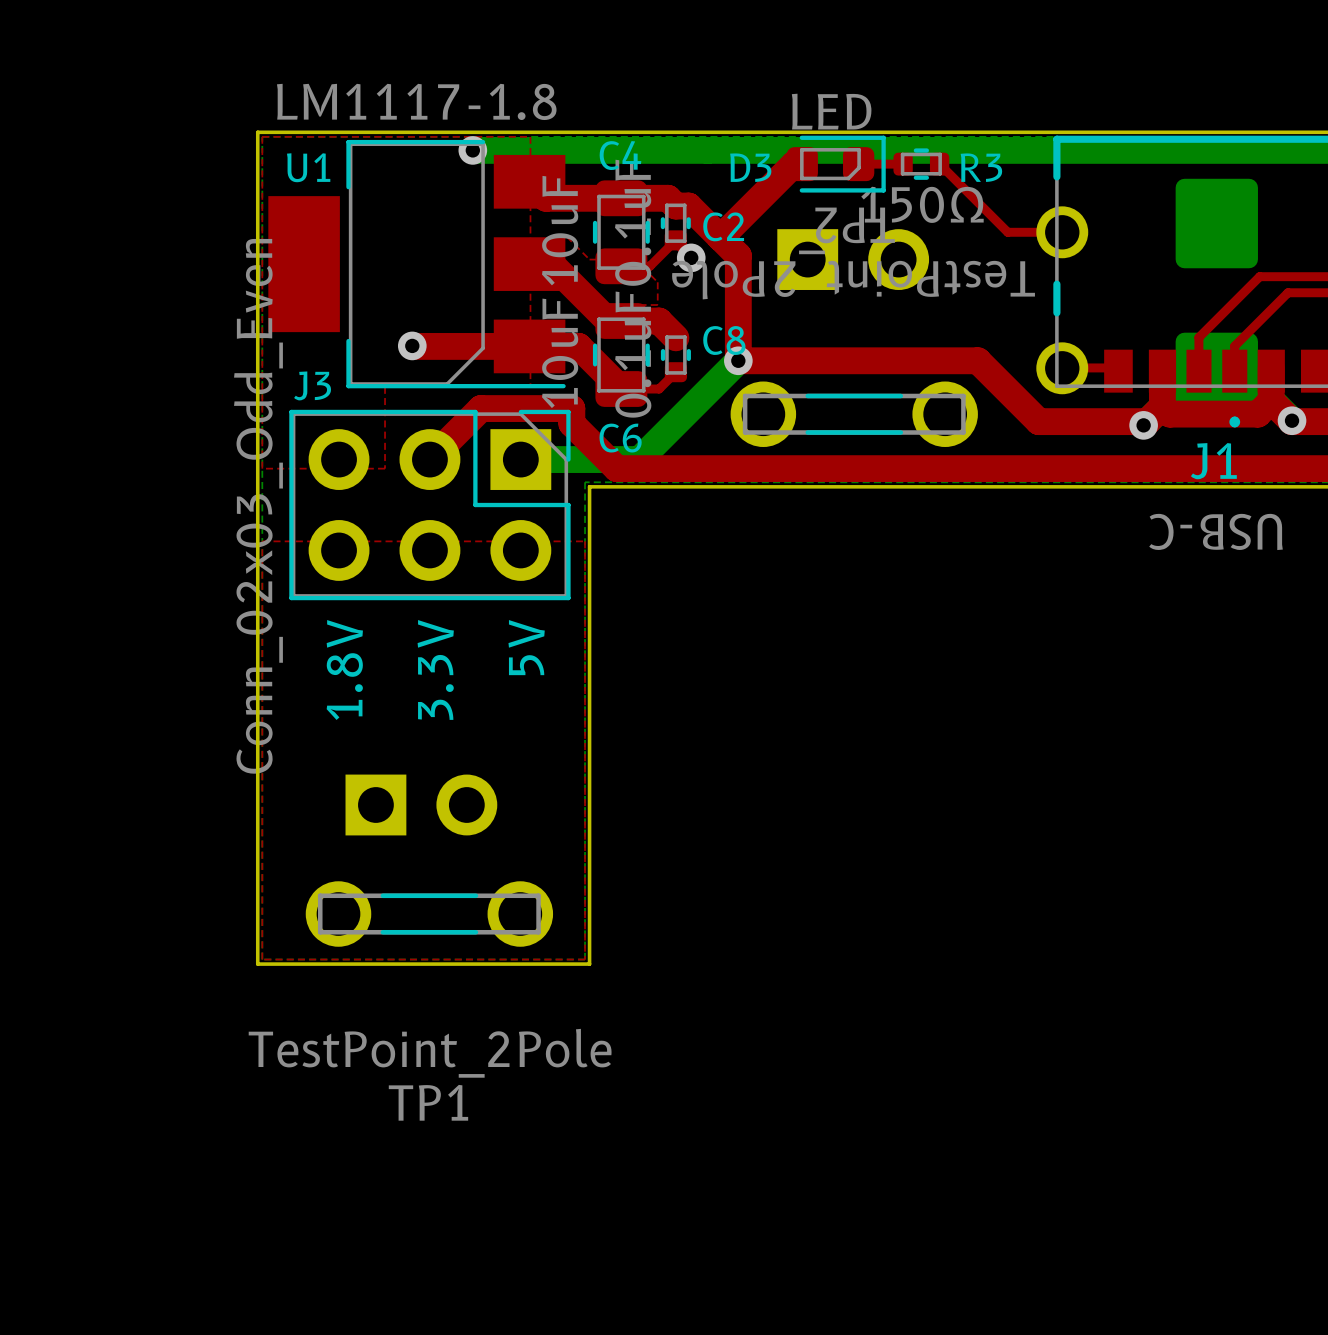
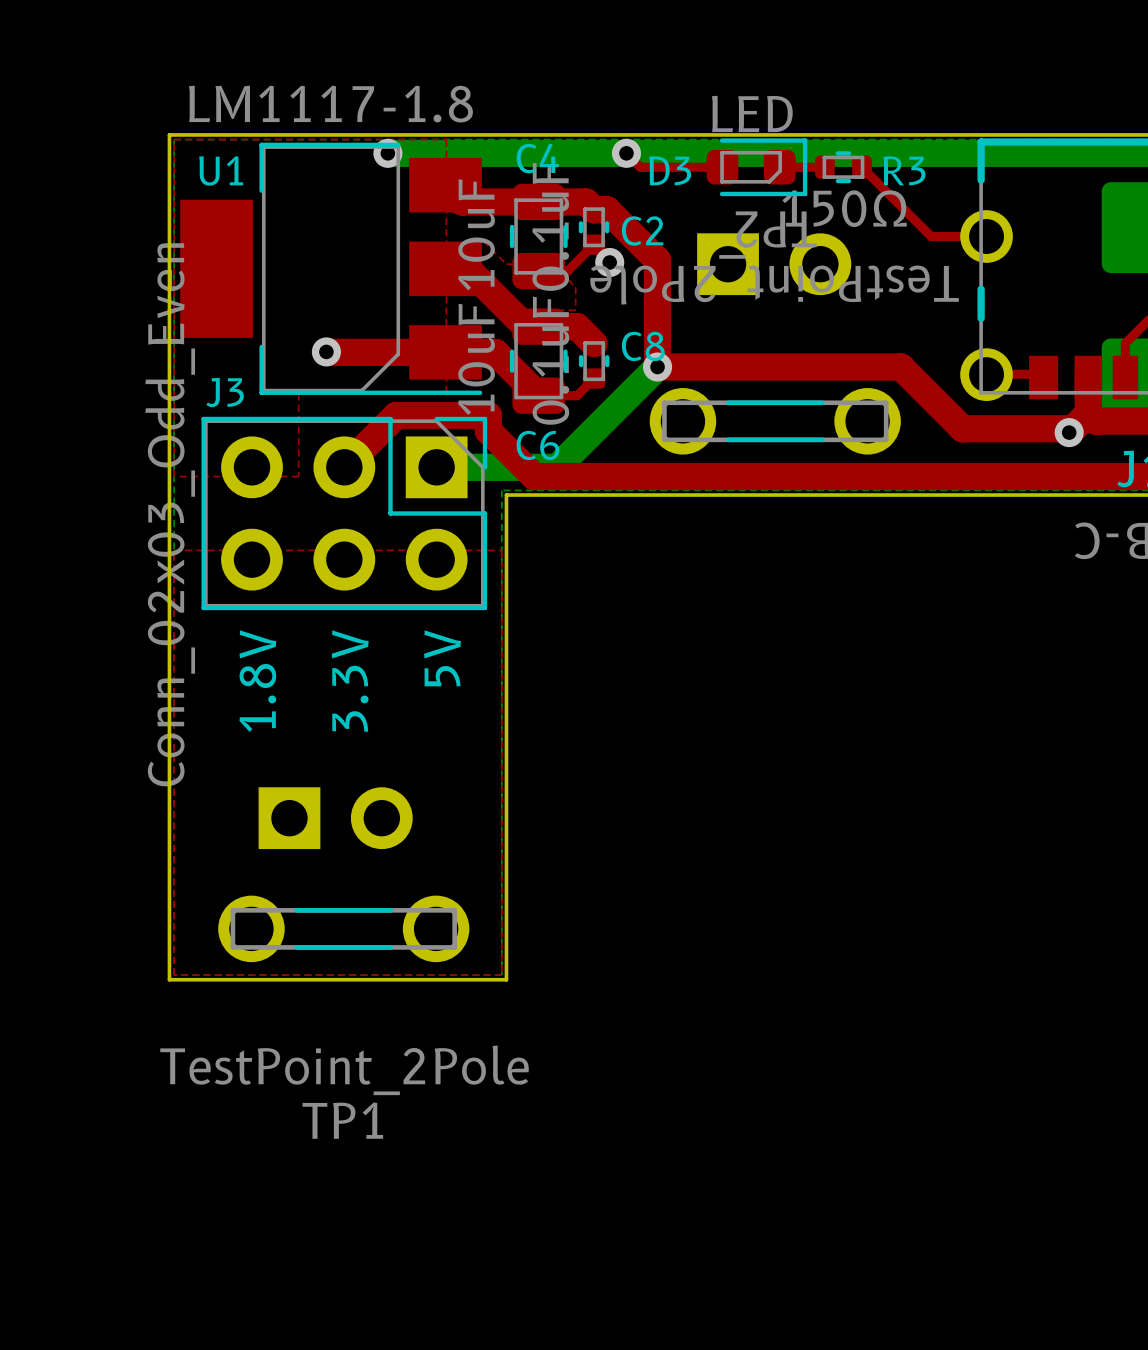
via: none -> (626, 153)
top track: (794, 164) (720, 237) -> (714, 167) (640, 167) (626, 153)

